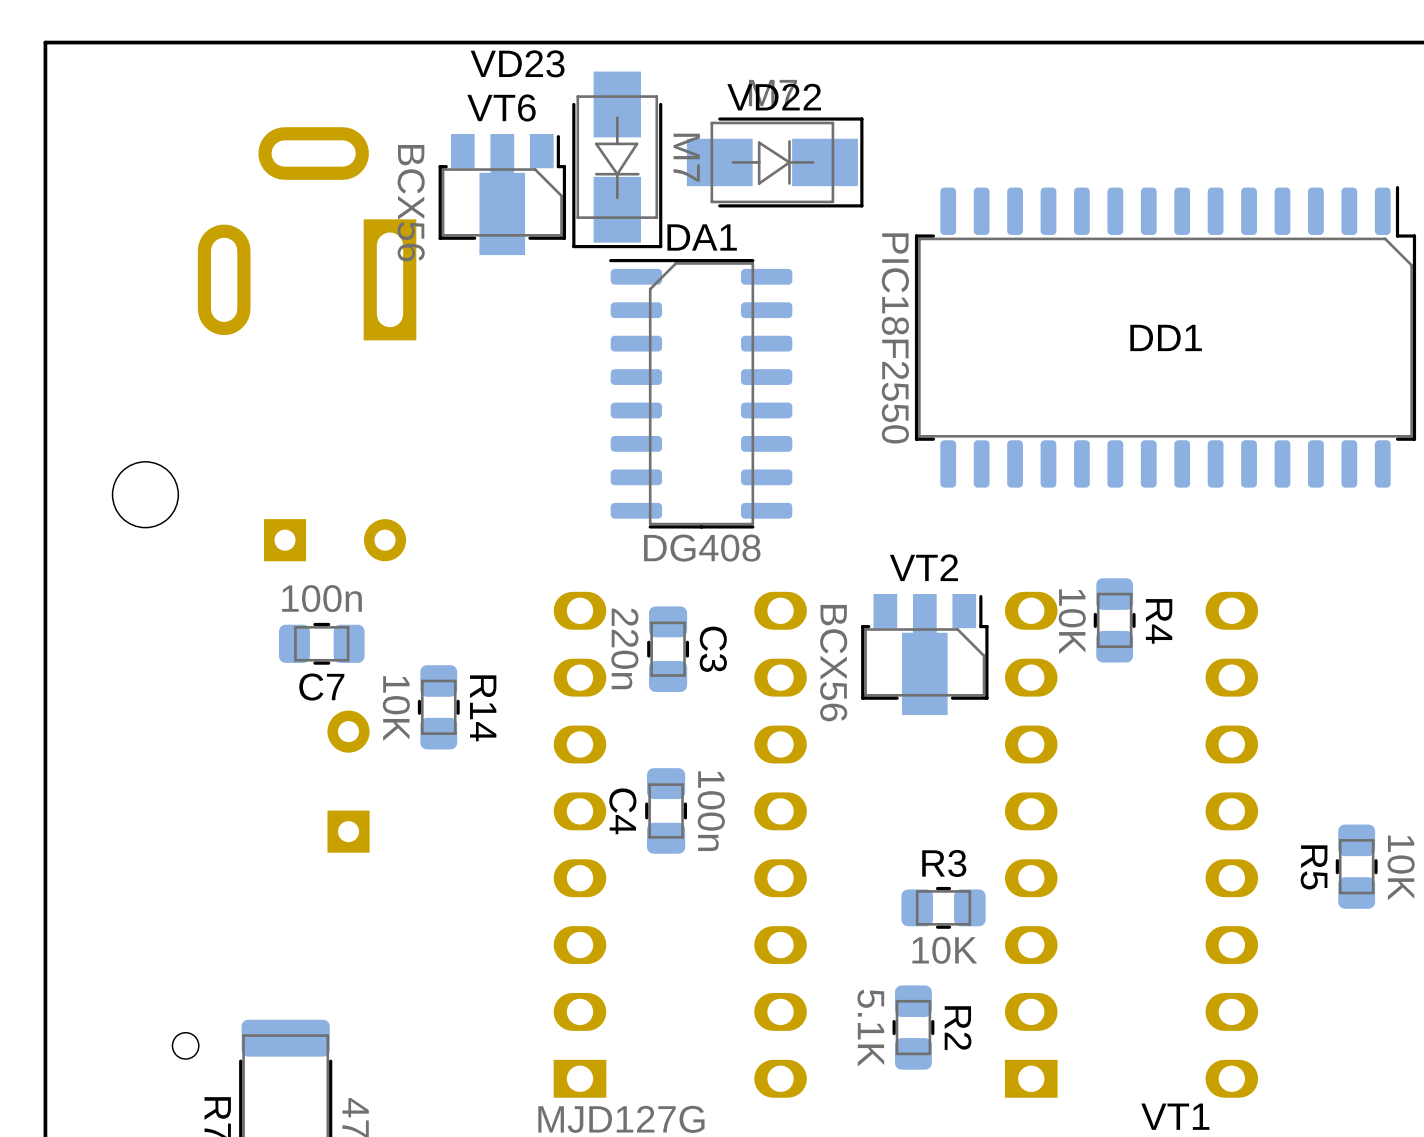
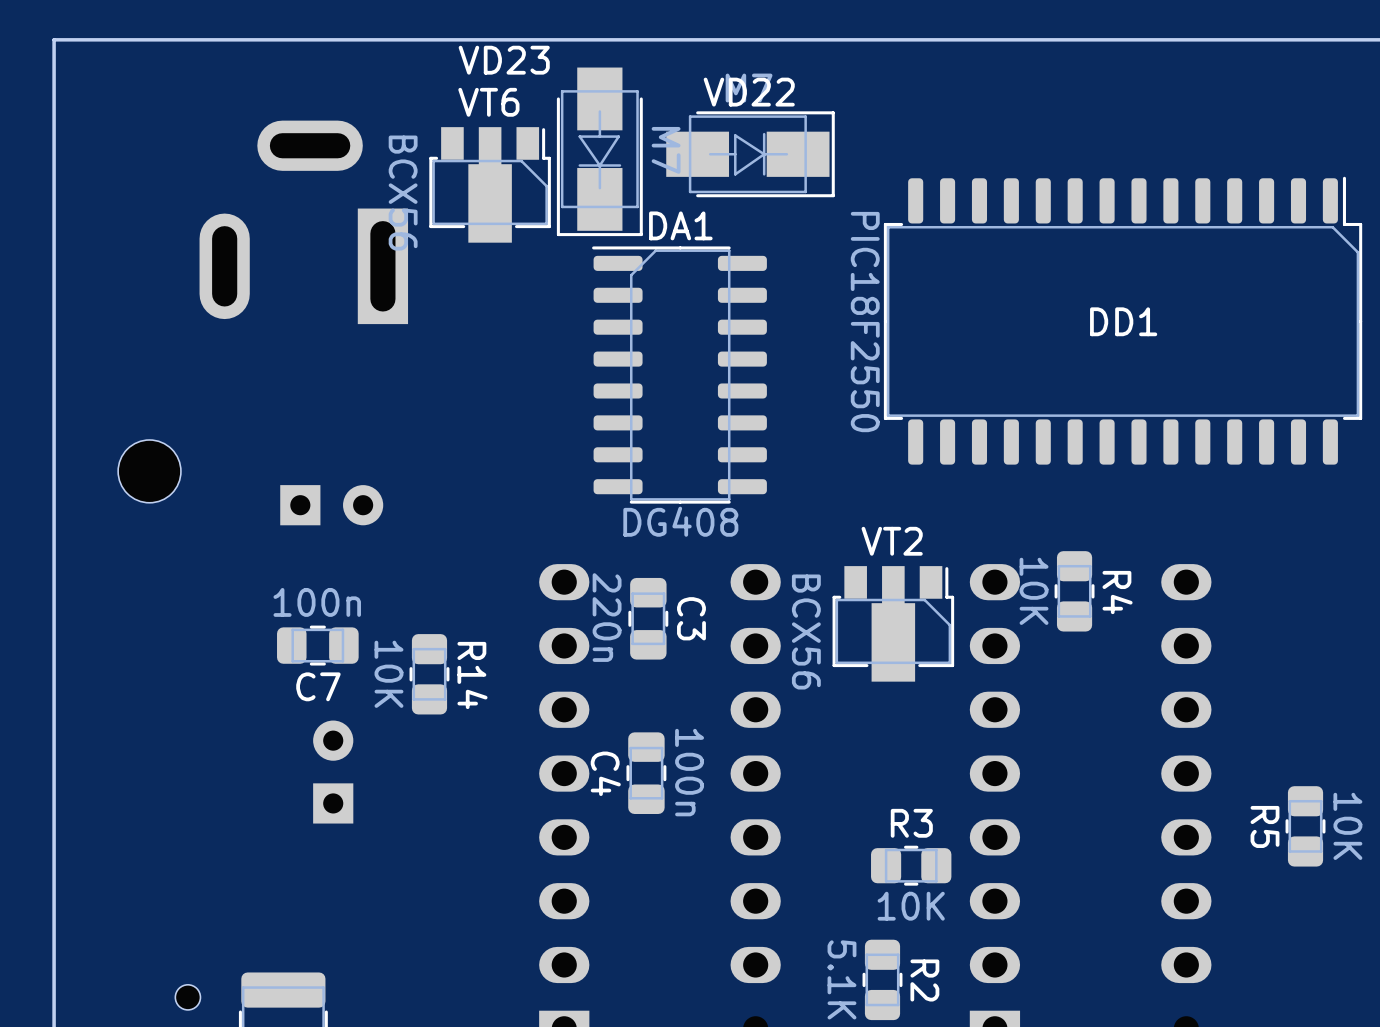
part footprint: [263, 519, 407, 562] -> [280, 485, 384, 526]
C7 position: (321, 643) -> (317, 645)
part: (348, 781) -> none
part: none -> (333, 772)

